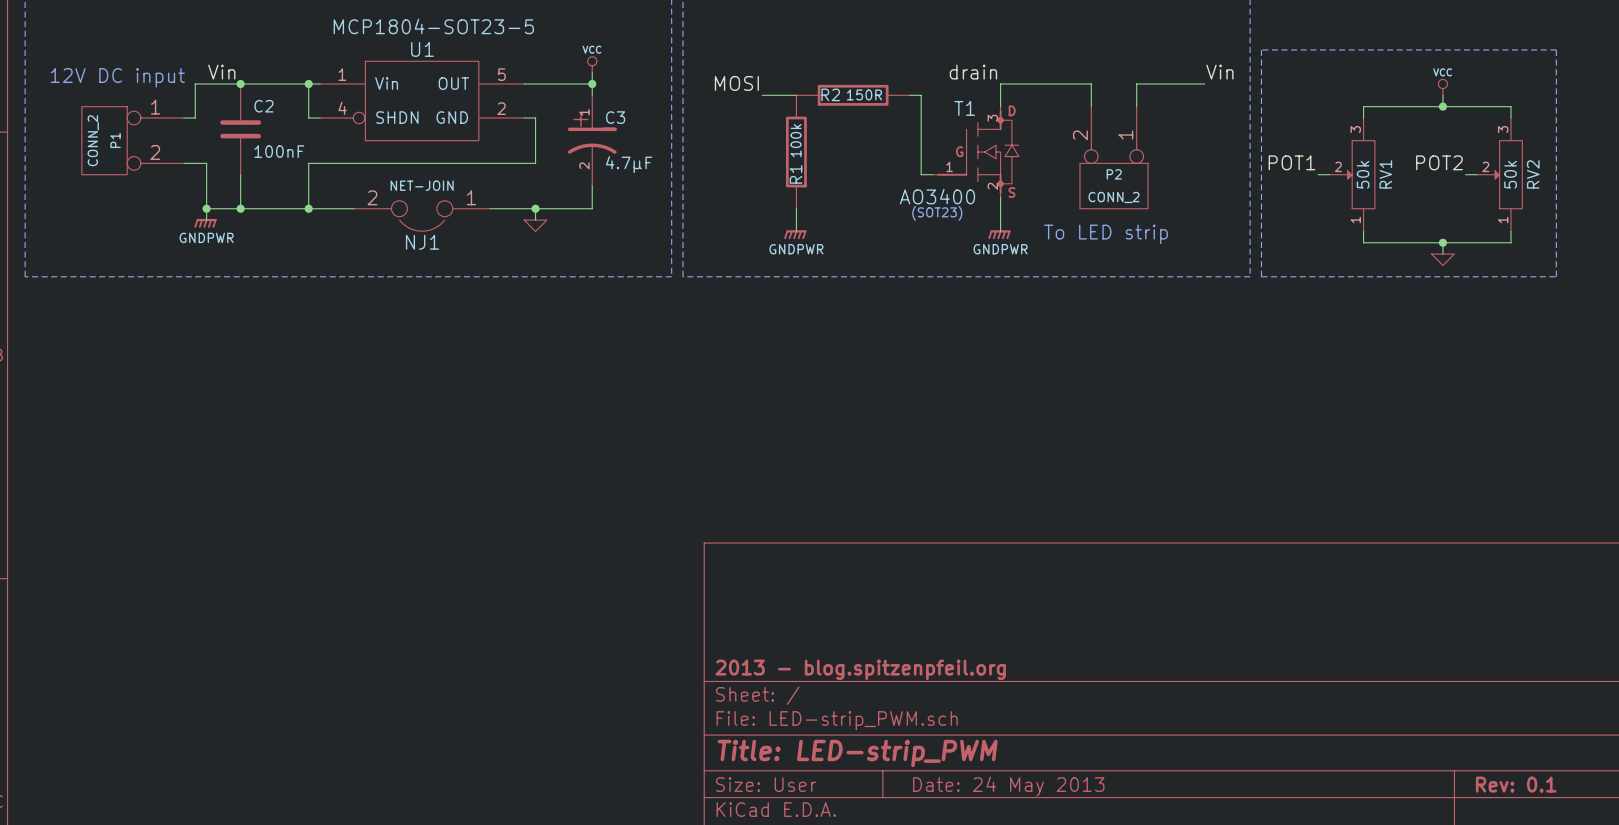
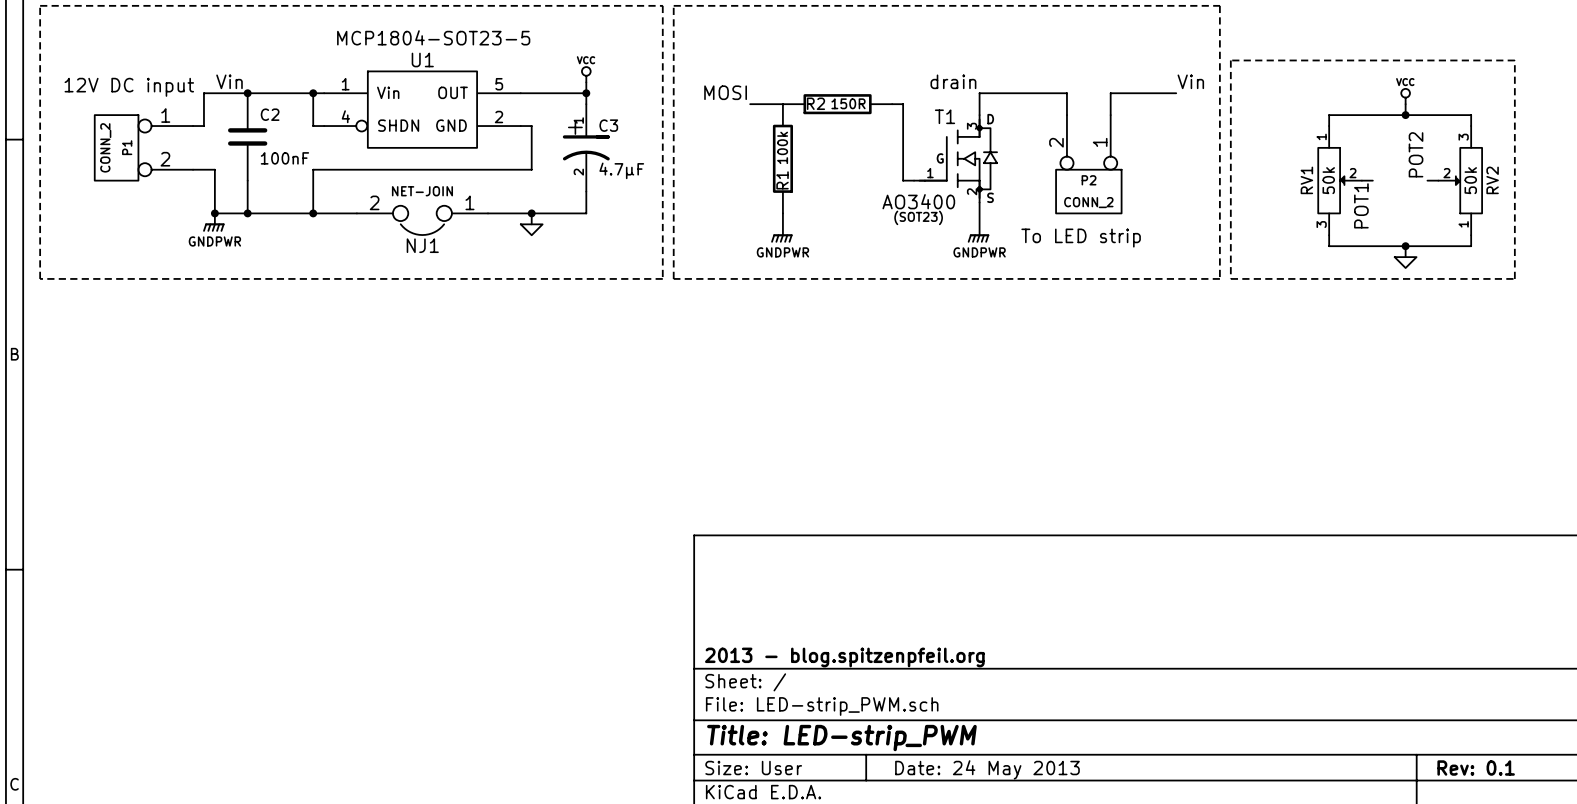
label rotation: 0° (1292, 162) -> 90° counterclockwise (1361, 205)
label position: POT1 (1292, 162) -> POT1 (1361, 205)
label rotation: 0° (1439, 162) -> 90° counterclockwise (1416, 154)
wire: (1318, 174) (1329, 174) -> (1361, 180) (1372, 180)
RV1 rotation: 0° (1361, 174) -> 180° (1331, 180)

